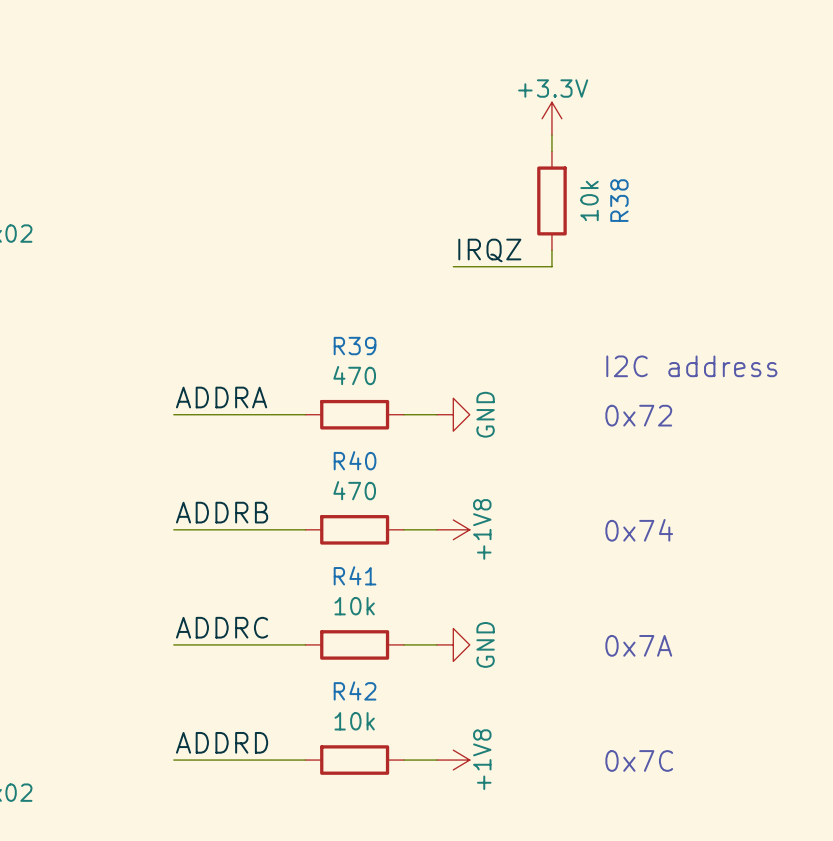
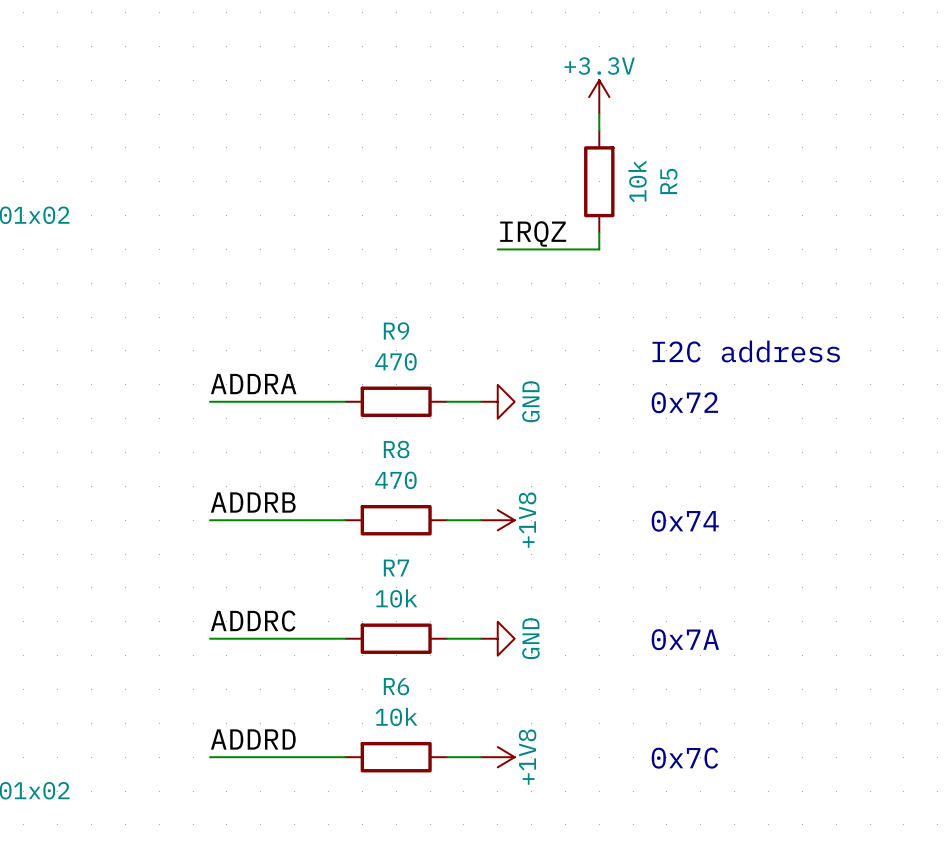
R38 name: R38 (619, 200) -> R5 (668, 181)
R39 name: R39 (355, 346) -> R9 (396, 330)
R40 name: R40 (355, 460) -> R8 (396, 449)
R41 name: R41 (355, 575) -> R7 (396, 568)
R42 name: R42 (355, 690) -> R6 (396, 686)

